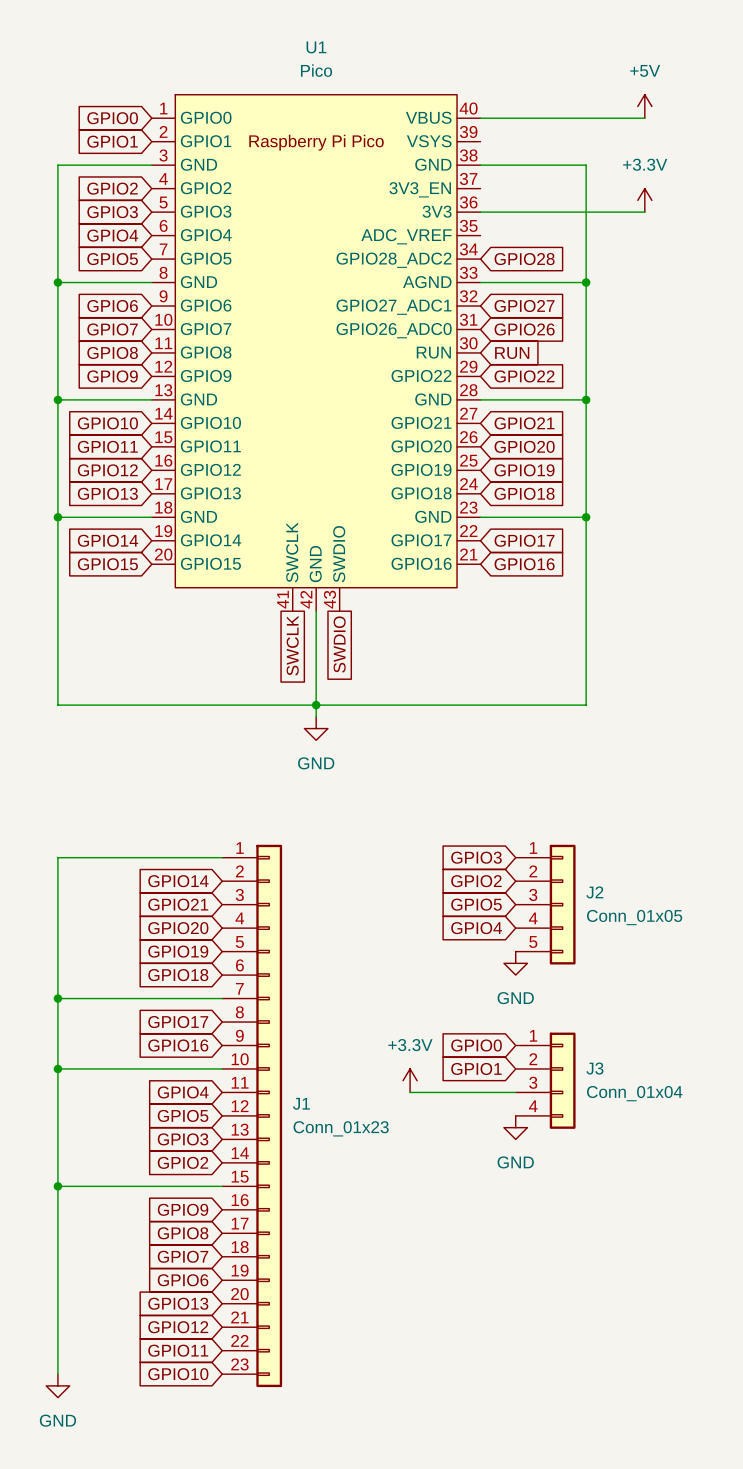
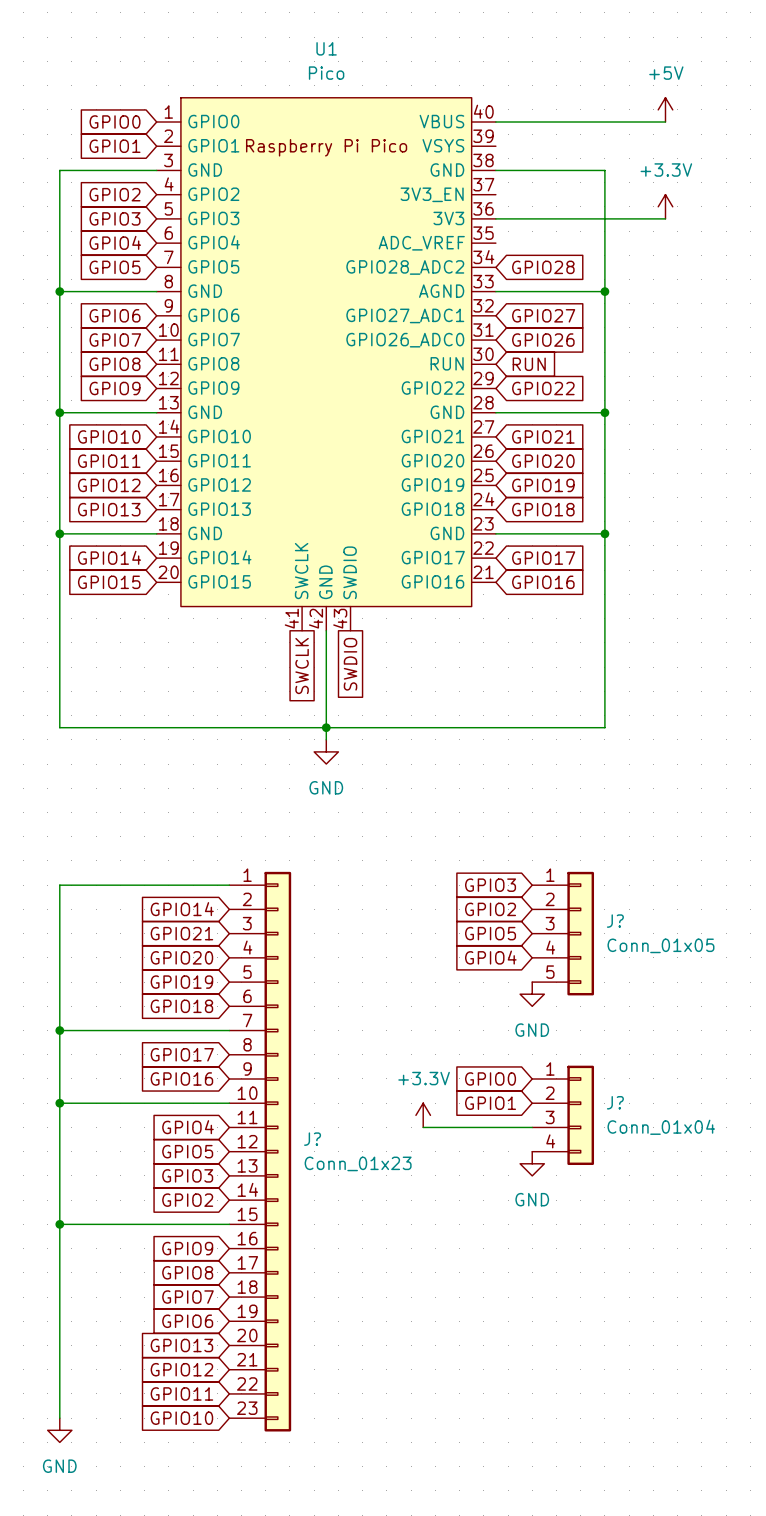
J2 name: J2 (594, 892) -> J? (615, 921)
J3 name: J3 (594, 1068) -> J? (615, 1102)
J1 name: J1 (301, 1103) -> J? (312, 1139)

